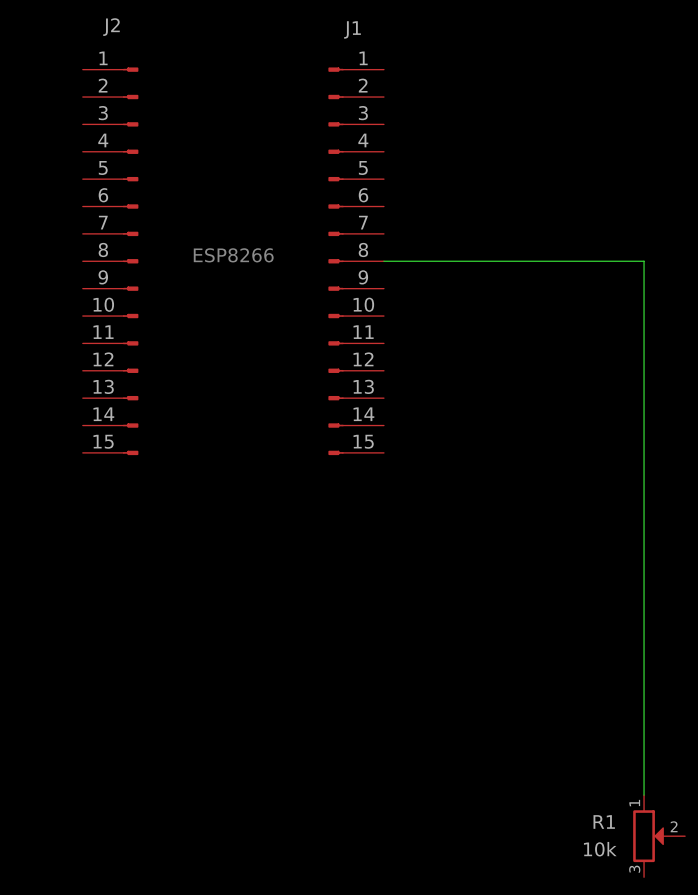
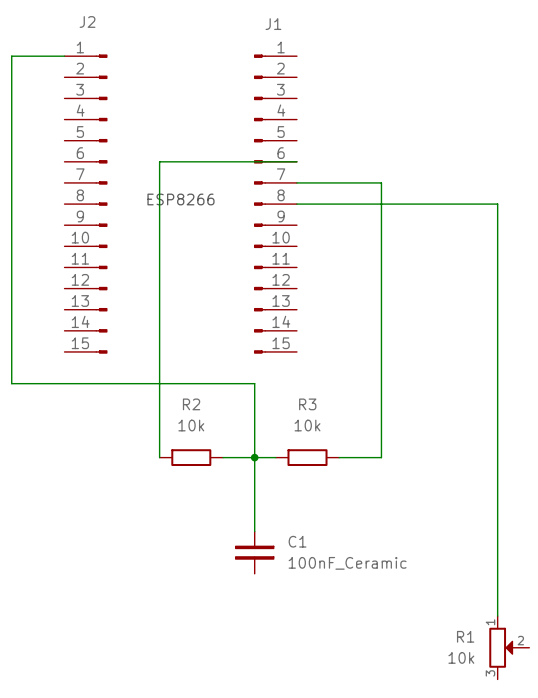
wire: none -> (64, 56) (11, 56) (11, 383) (254, 383) (254, 531)
wire: none -> (296, 161) (159, 161) (159, 457)
wire: none -> (296, 182) (381, 182) (381, 457) (339, 457)
R2: none -> 10k (191, 457)
wire: none -> (222, 457) (275, 457)
junction: none -> (254, 457)
R3: none -> 10k (307, 457)
C1: none -> 100nF_Ceramic (254, 552)

